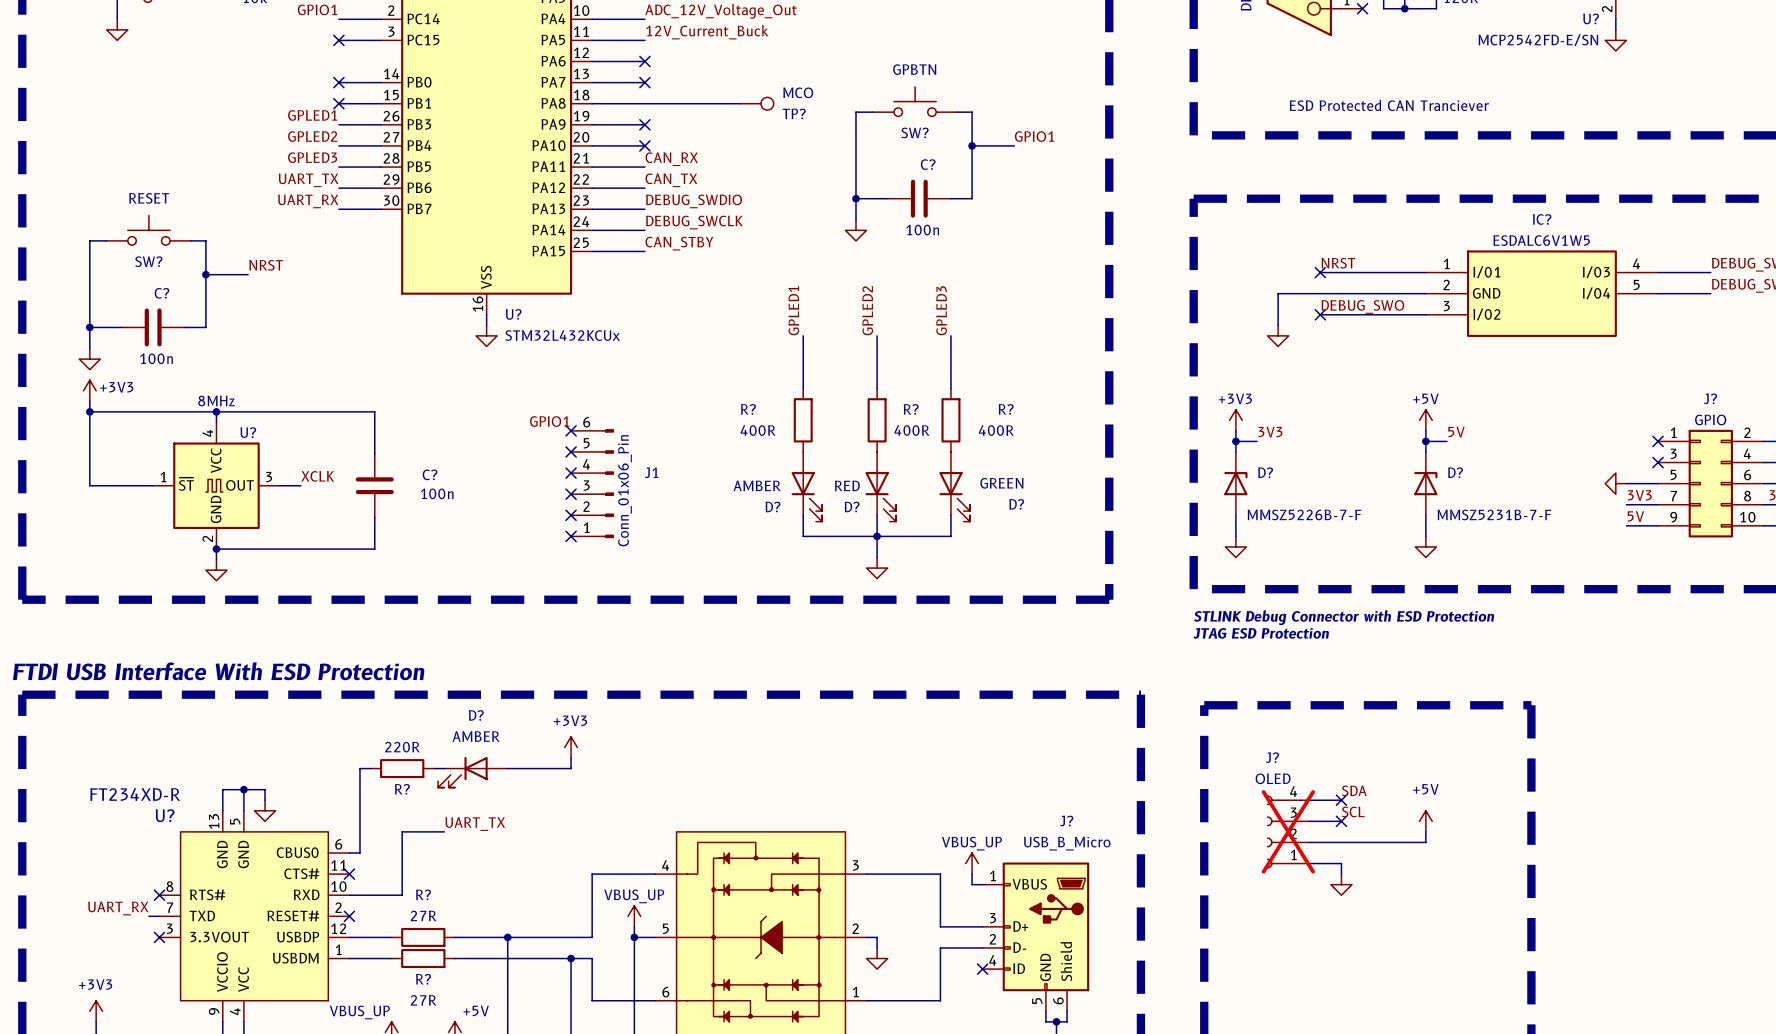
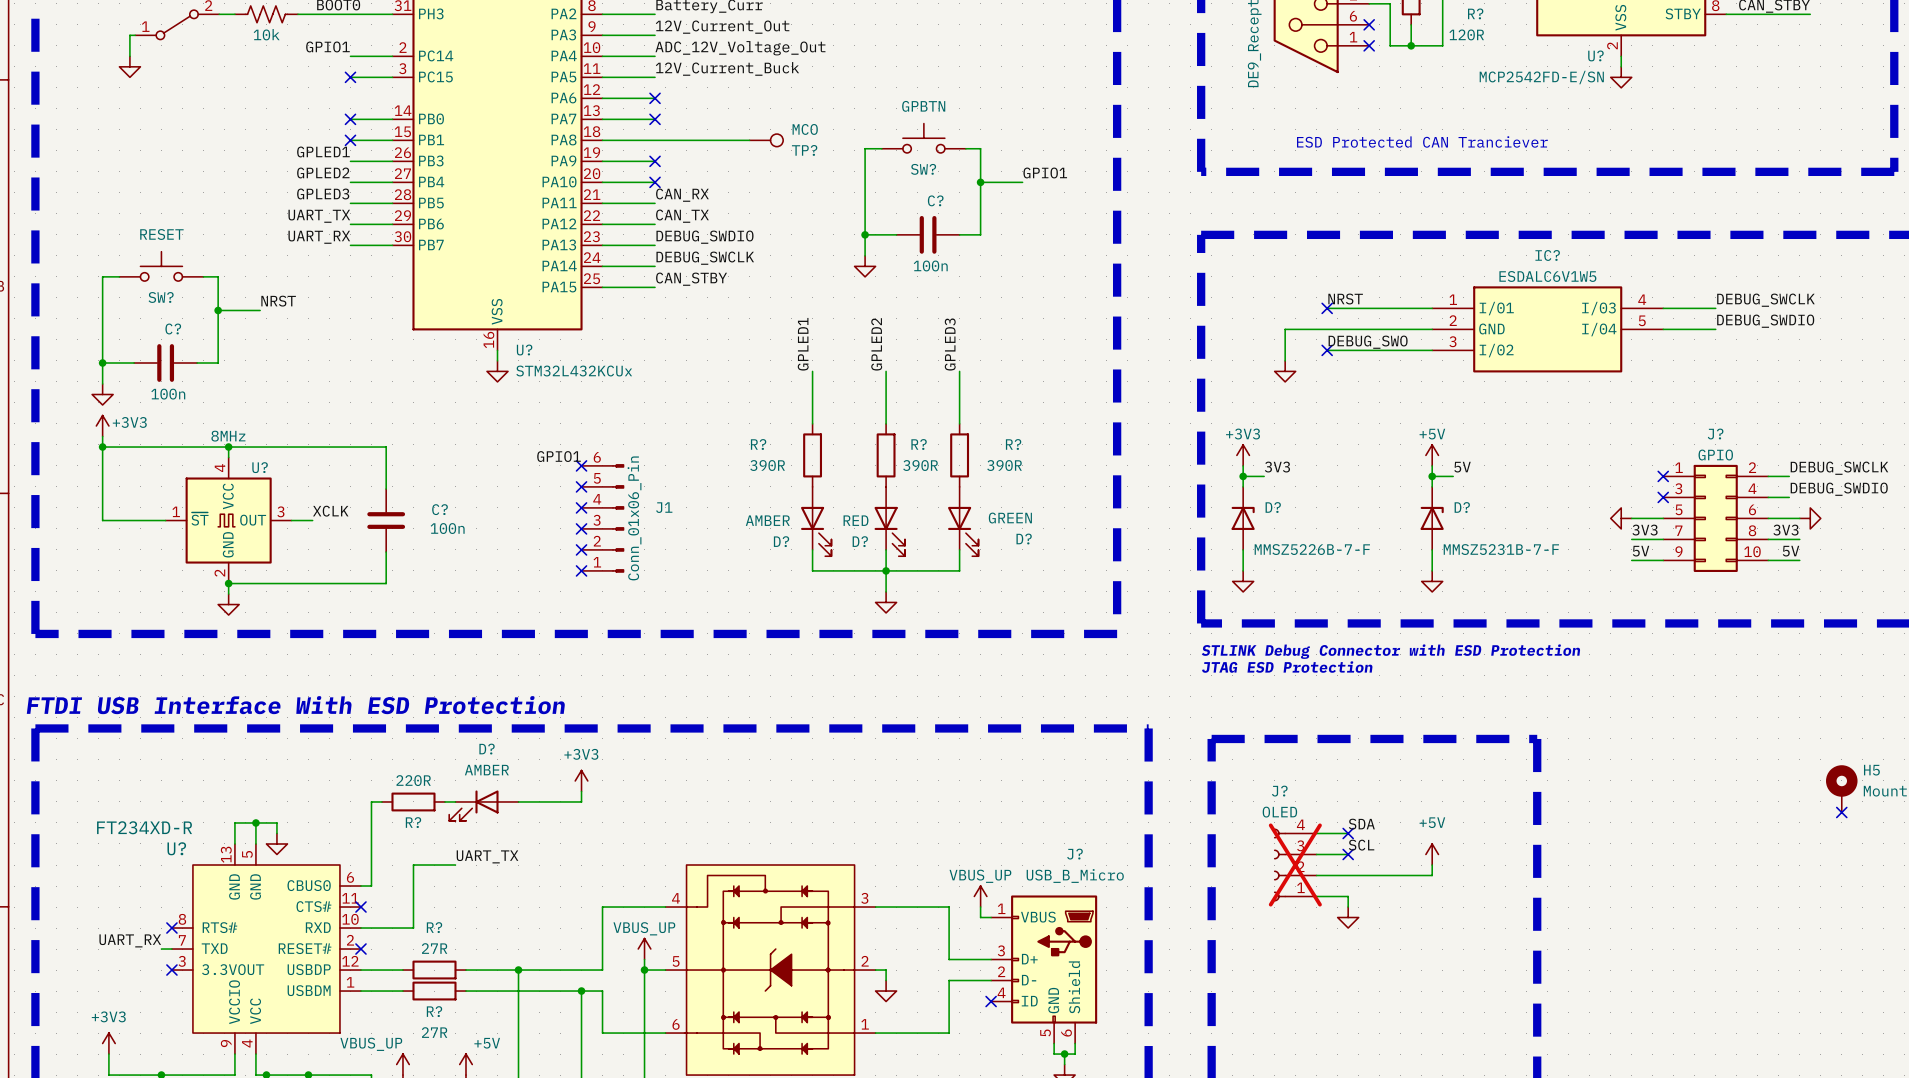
R? value: 400R (758, 430) -> 390R (767, 465)
R? value: 400R (911, 430) -> 390R (920, 465)
R? value: 400R (996, 430) -> 390R (1004, 465)

